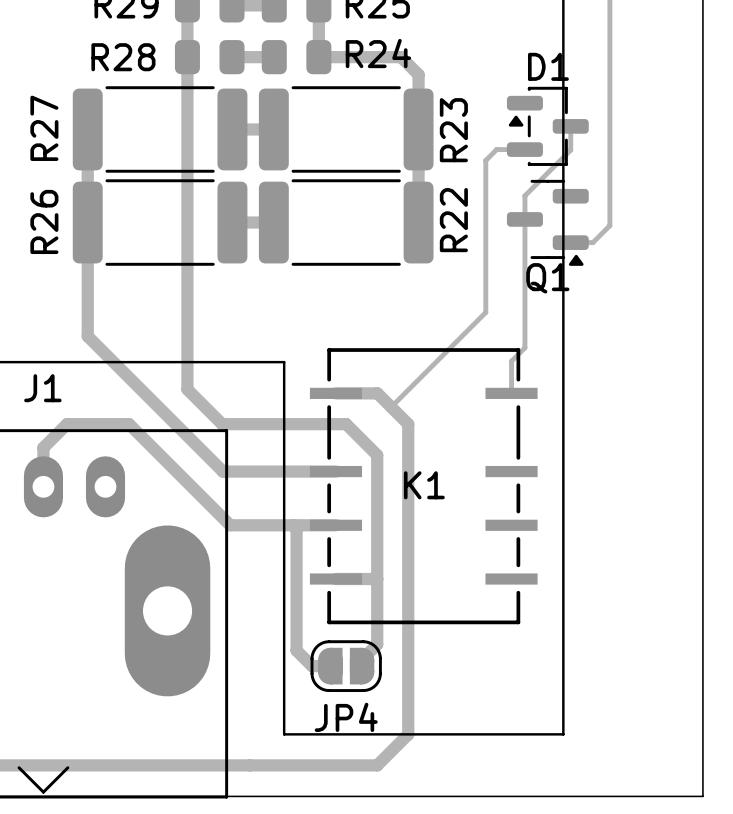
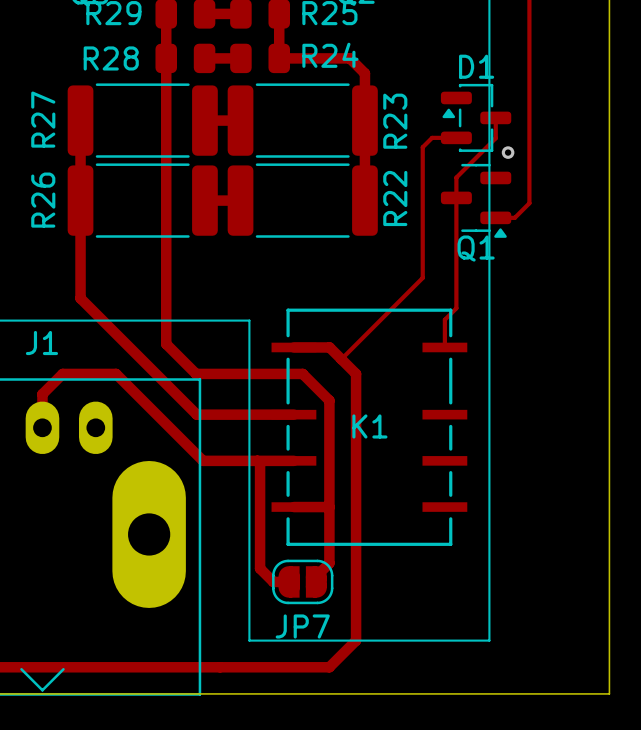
via: none -> (508, 152)
JP4 name: JP4 (346, 717) -> JP7 (302, 626)

